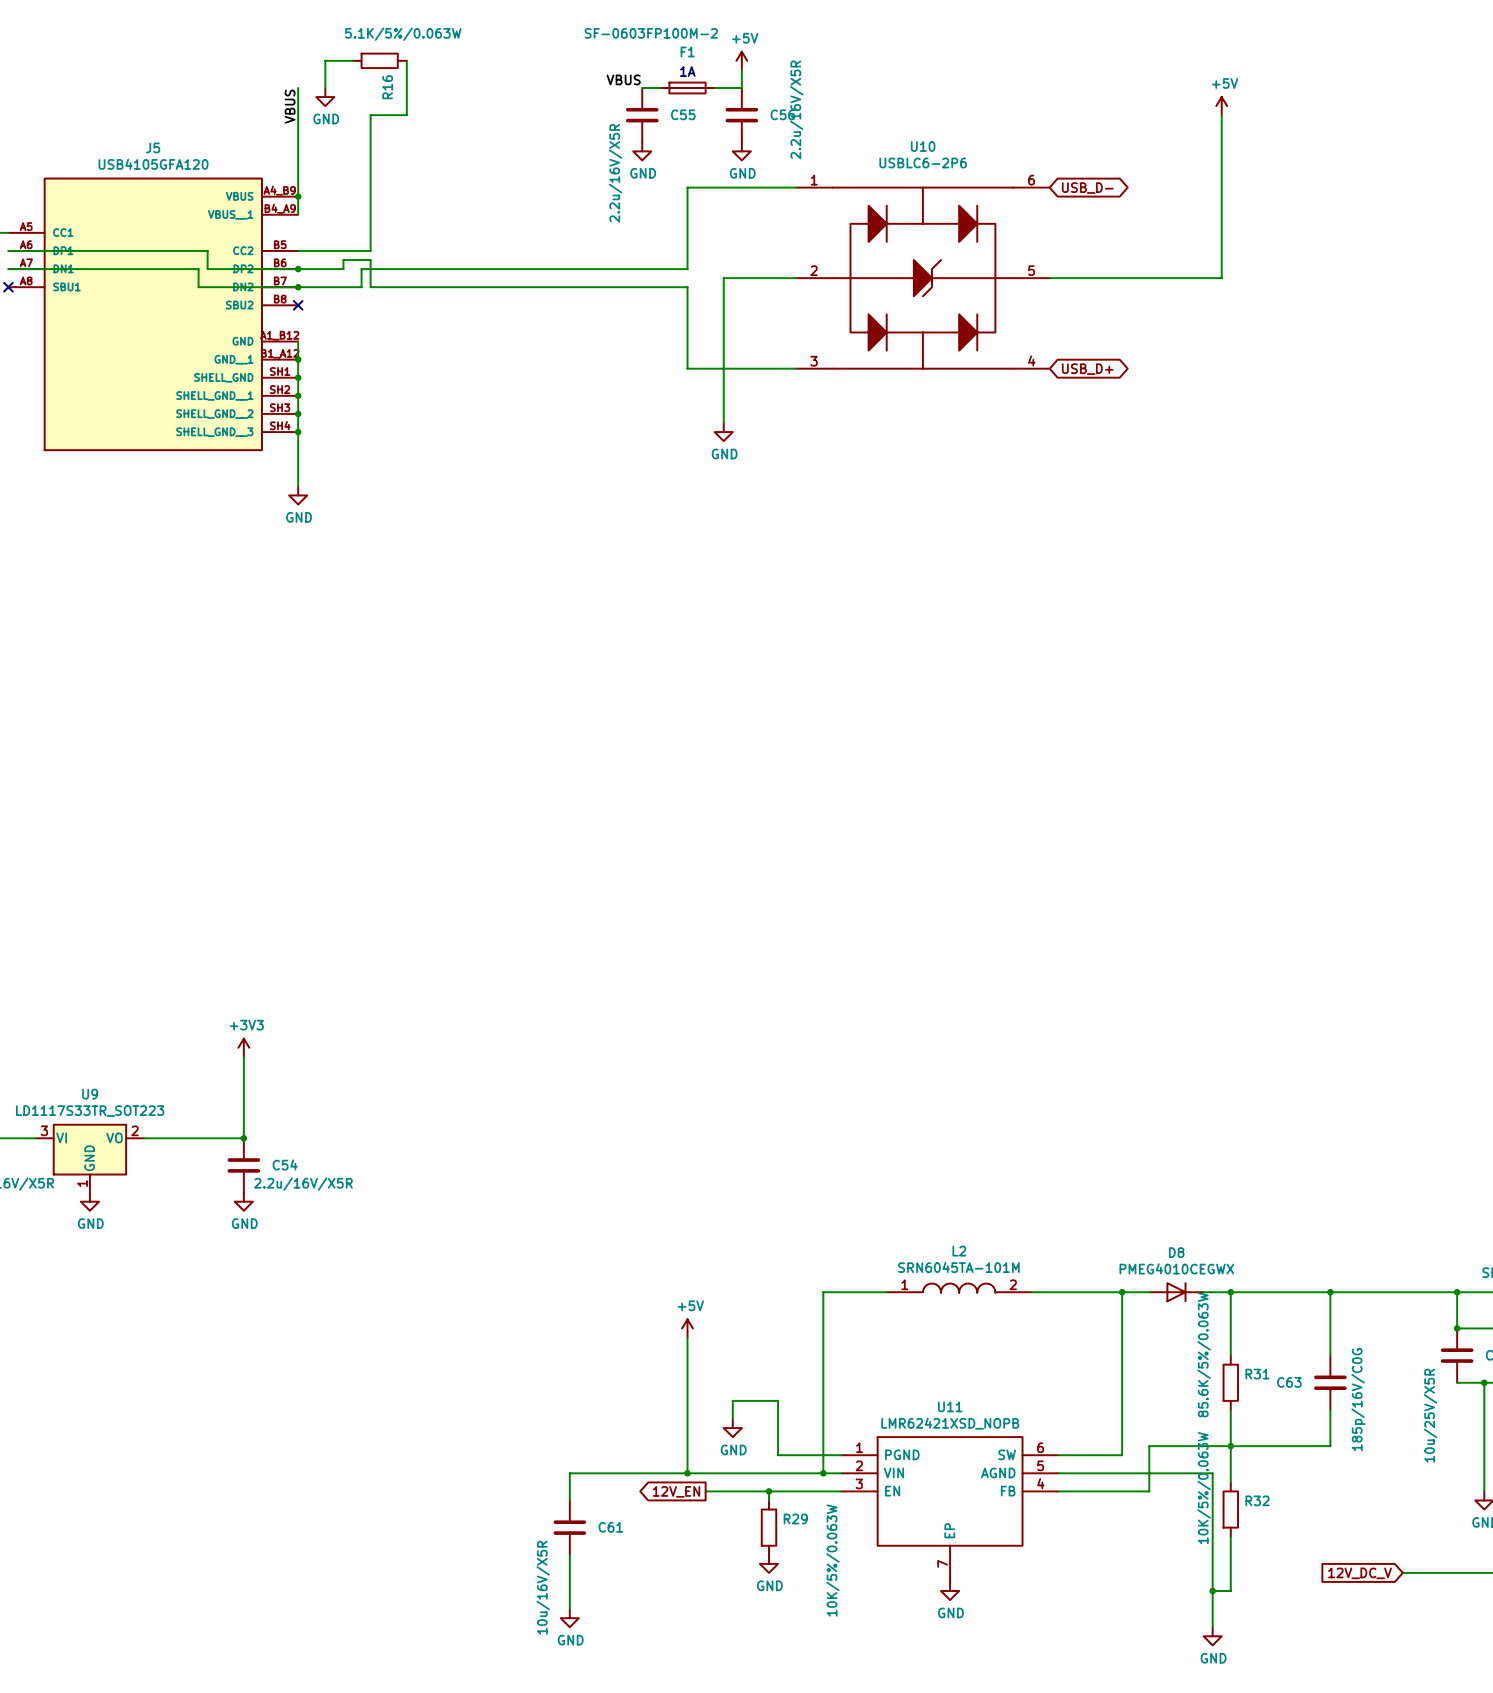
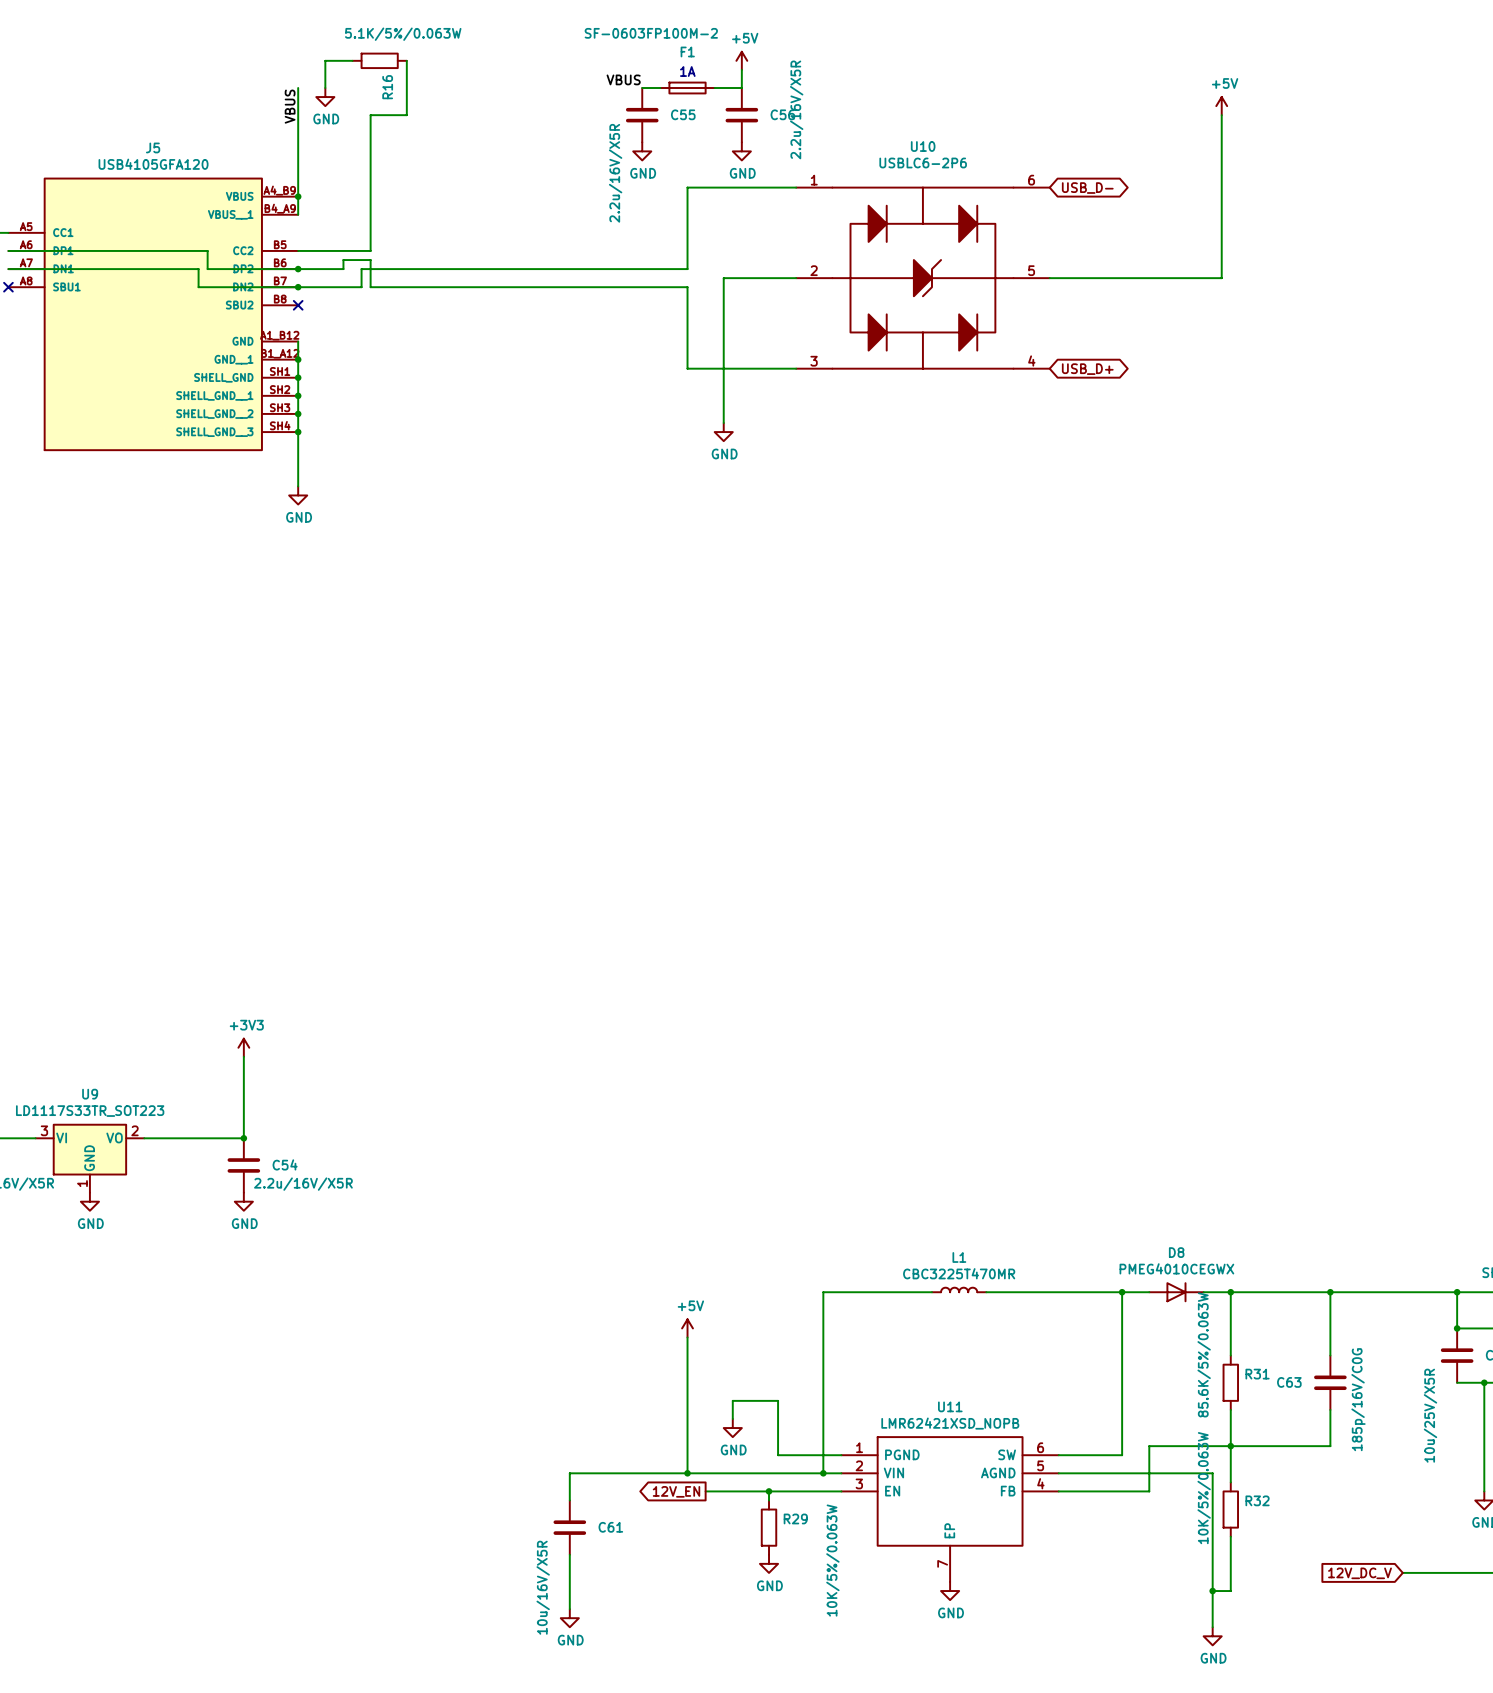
L2: SRN6045TA-101M (959, 1288) -> none
L1: none -> CBC3225T470MR (959, 1289)

